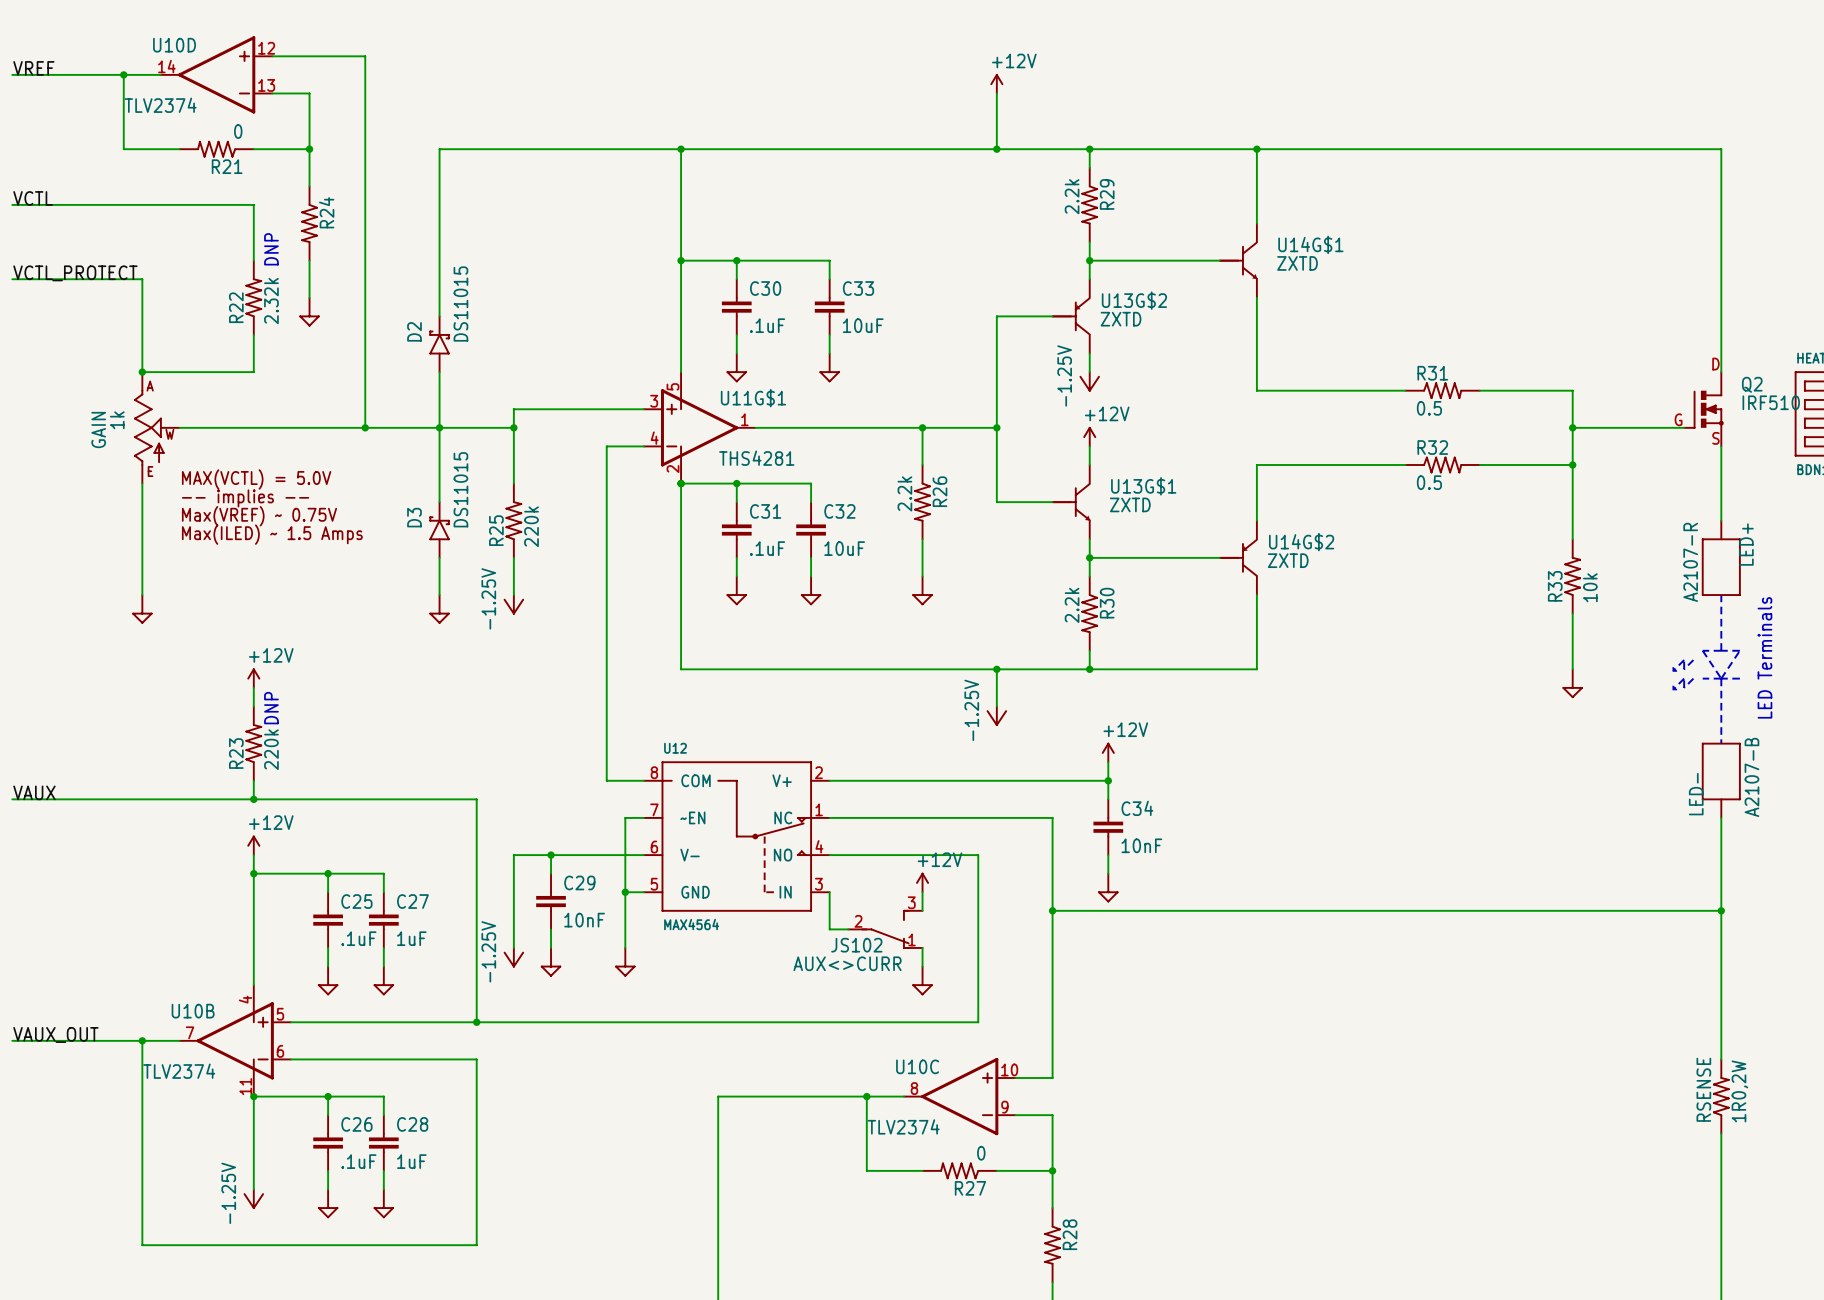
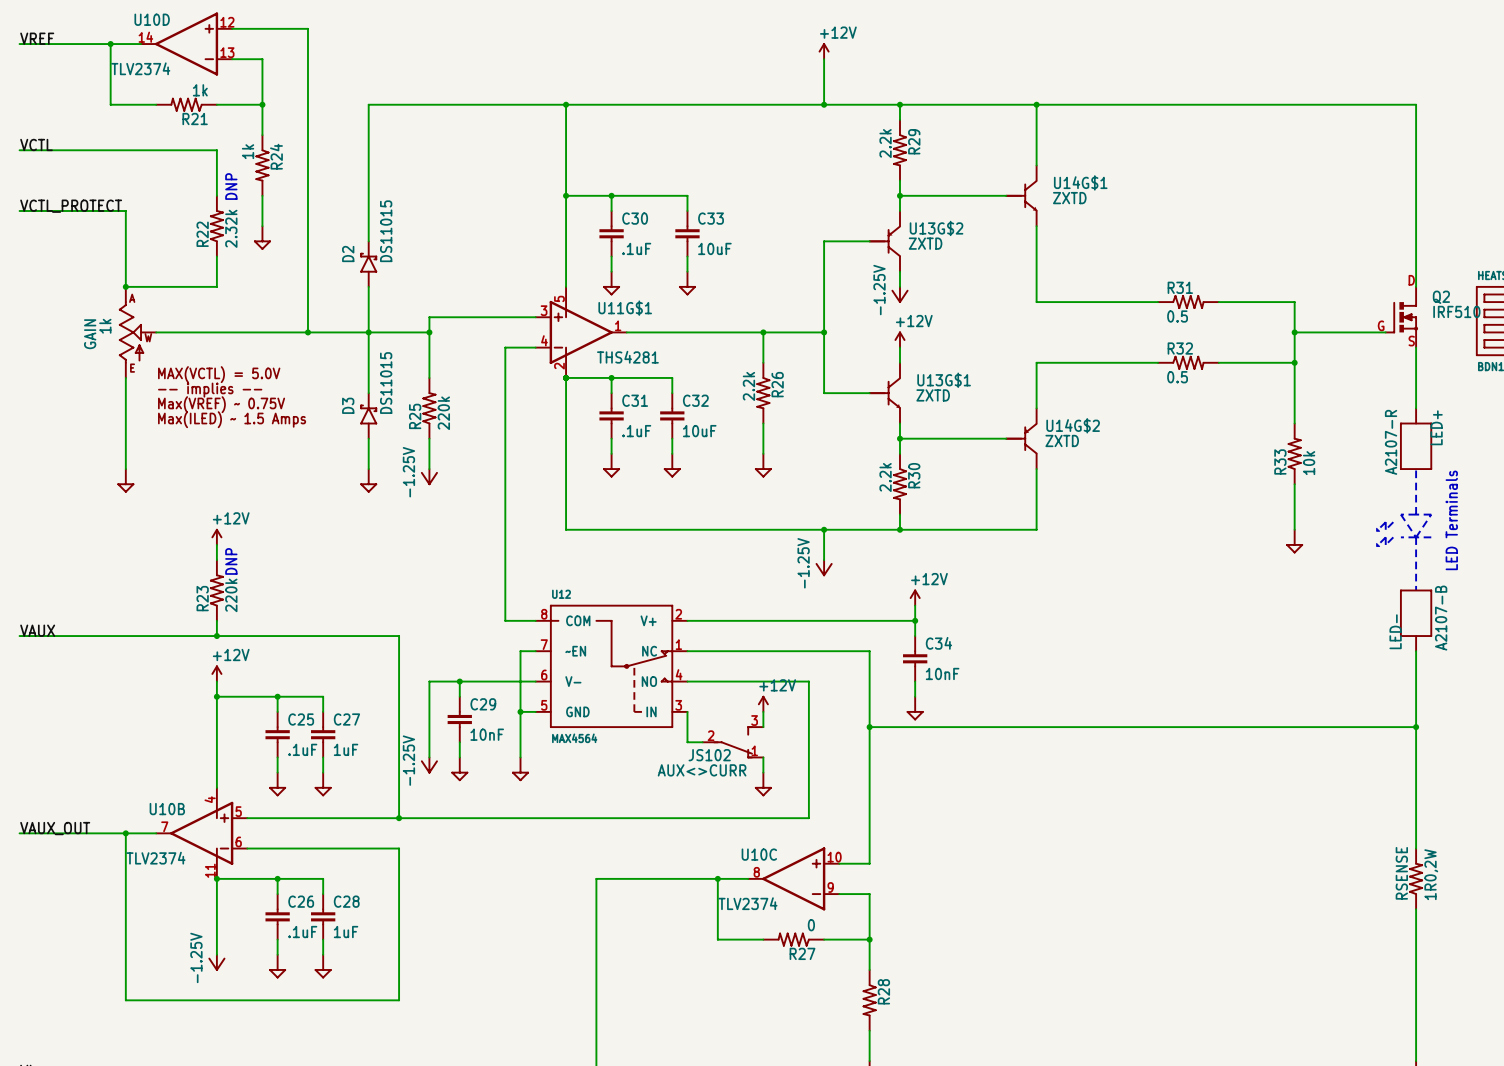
R21 value: 0 (238, 131) -> 1k (200, 90)
R24 value: none -> 1k (248, 151)

